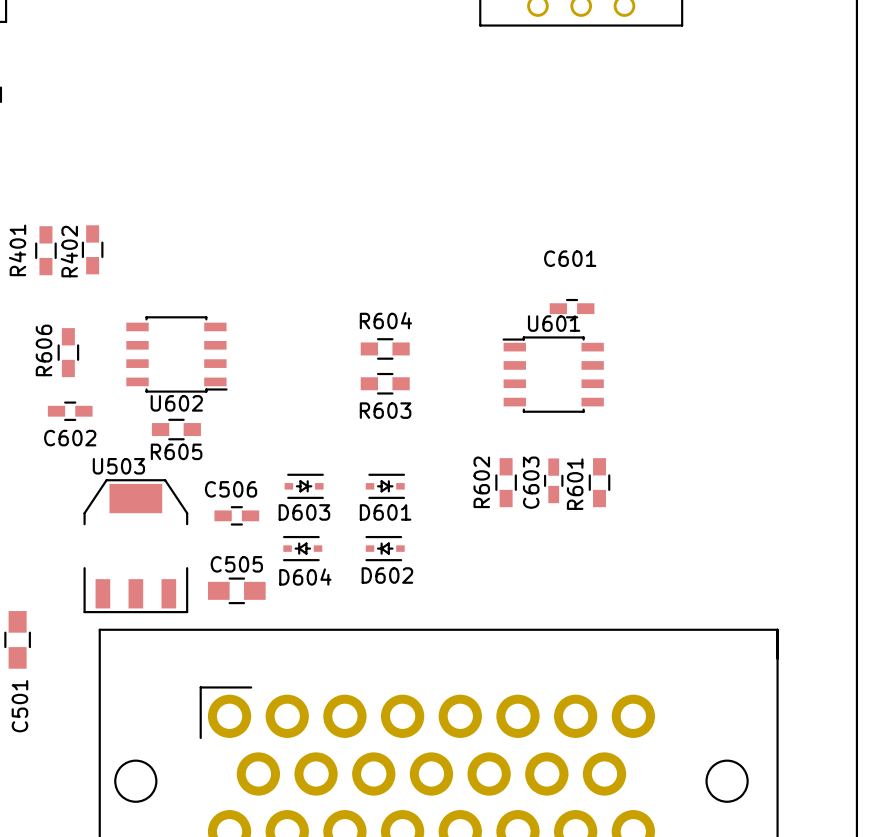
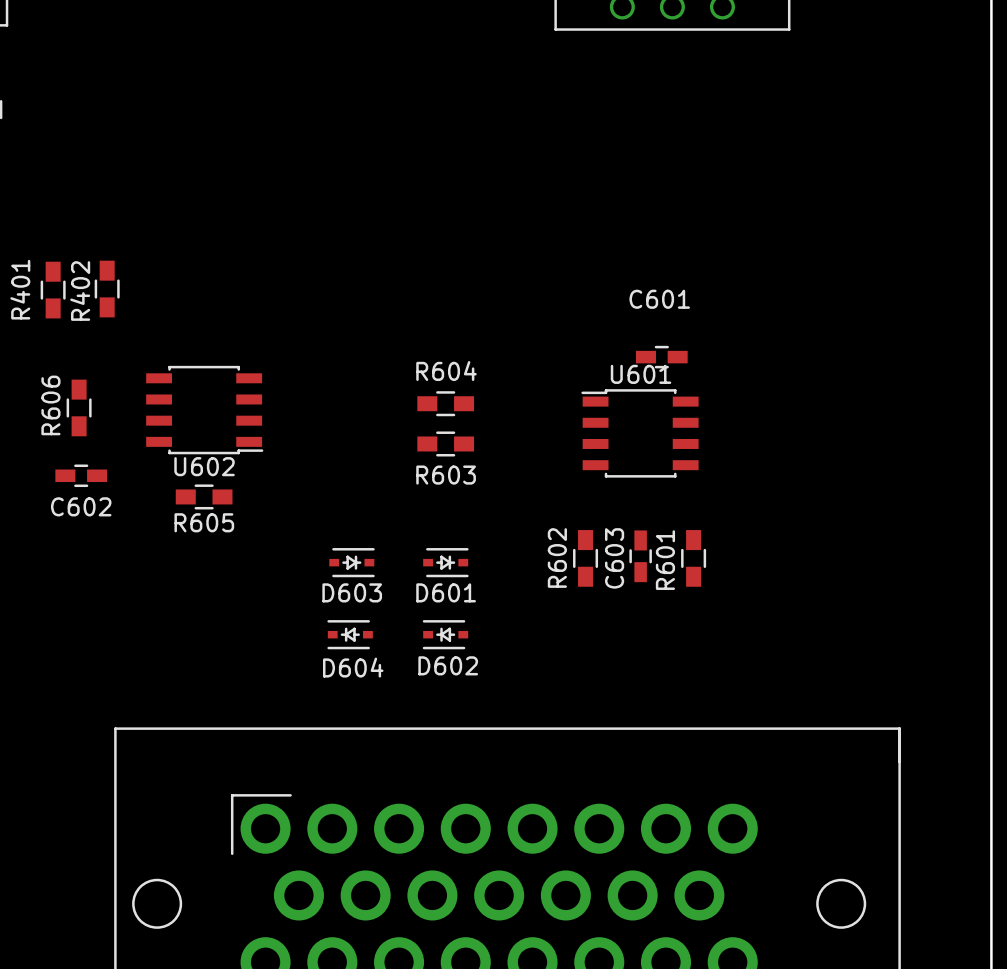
C506: (236, 515) -> none
U503: (135, 546) -> none
C505: (236, 590) -> none
C501: (17, 639) -> none

